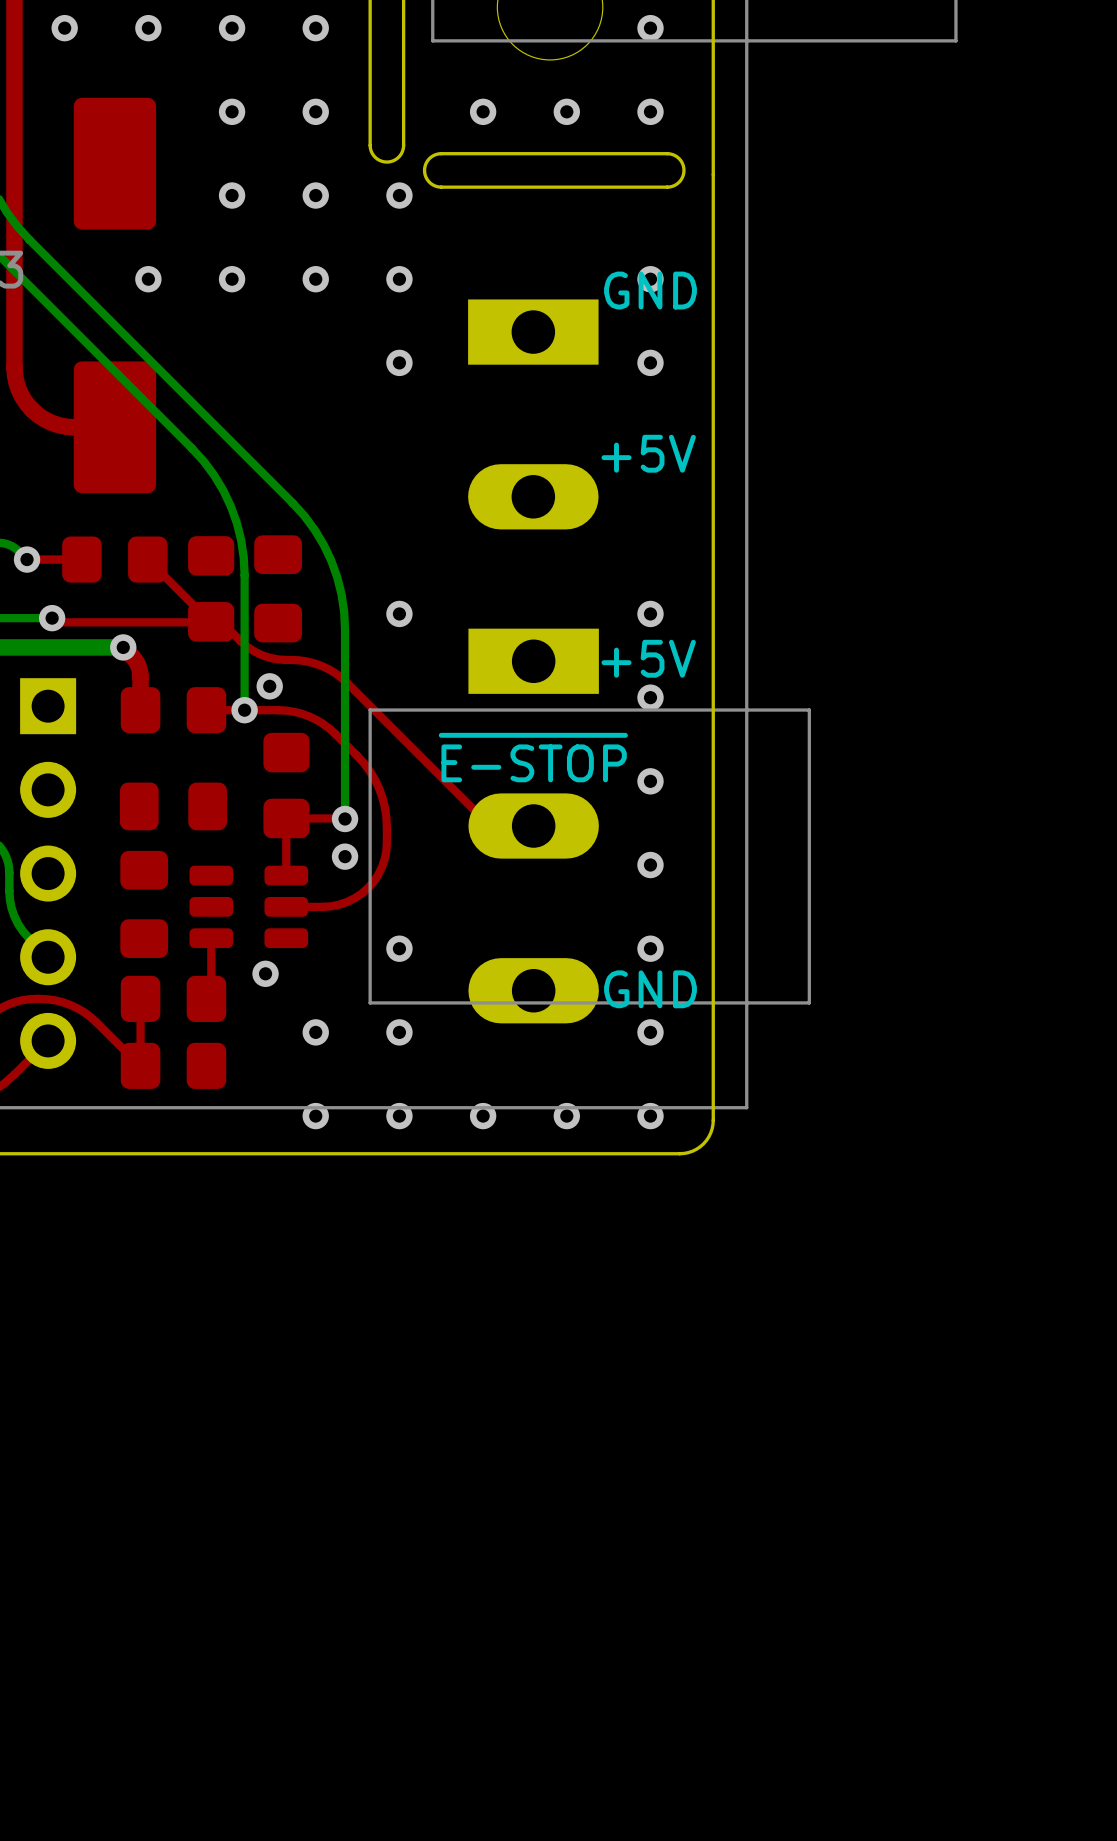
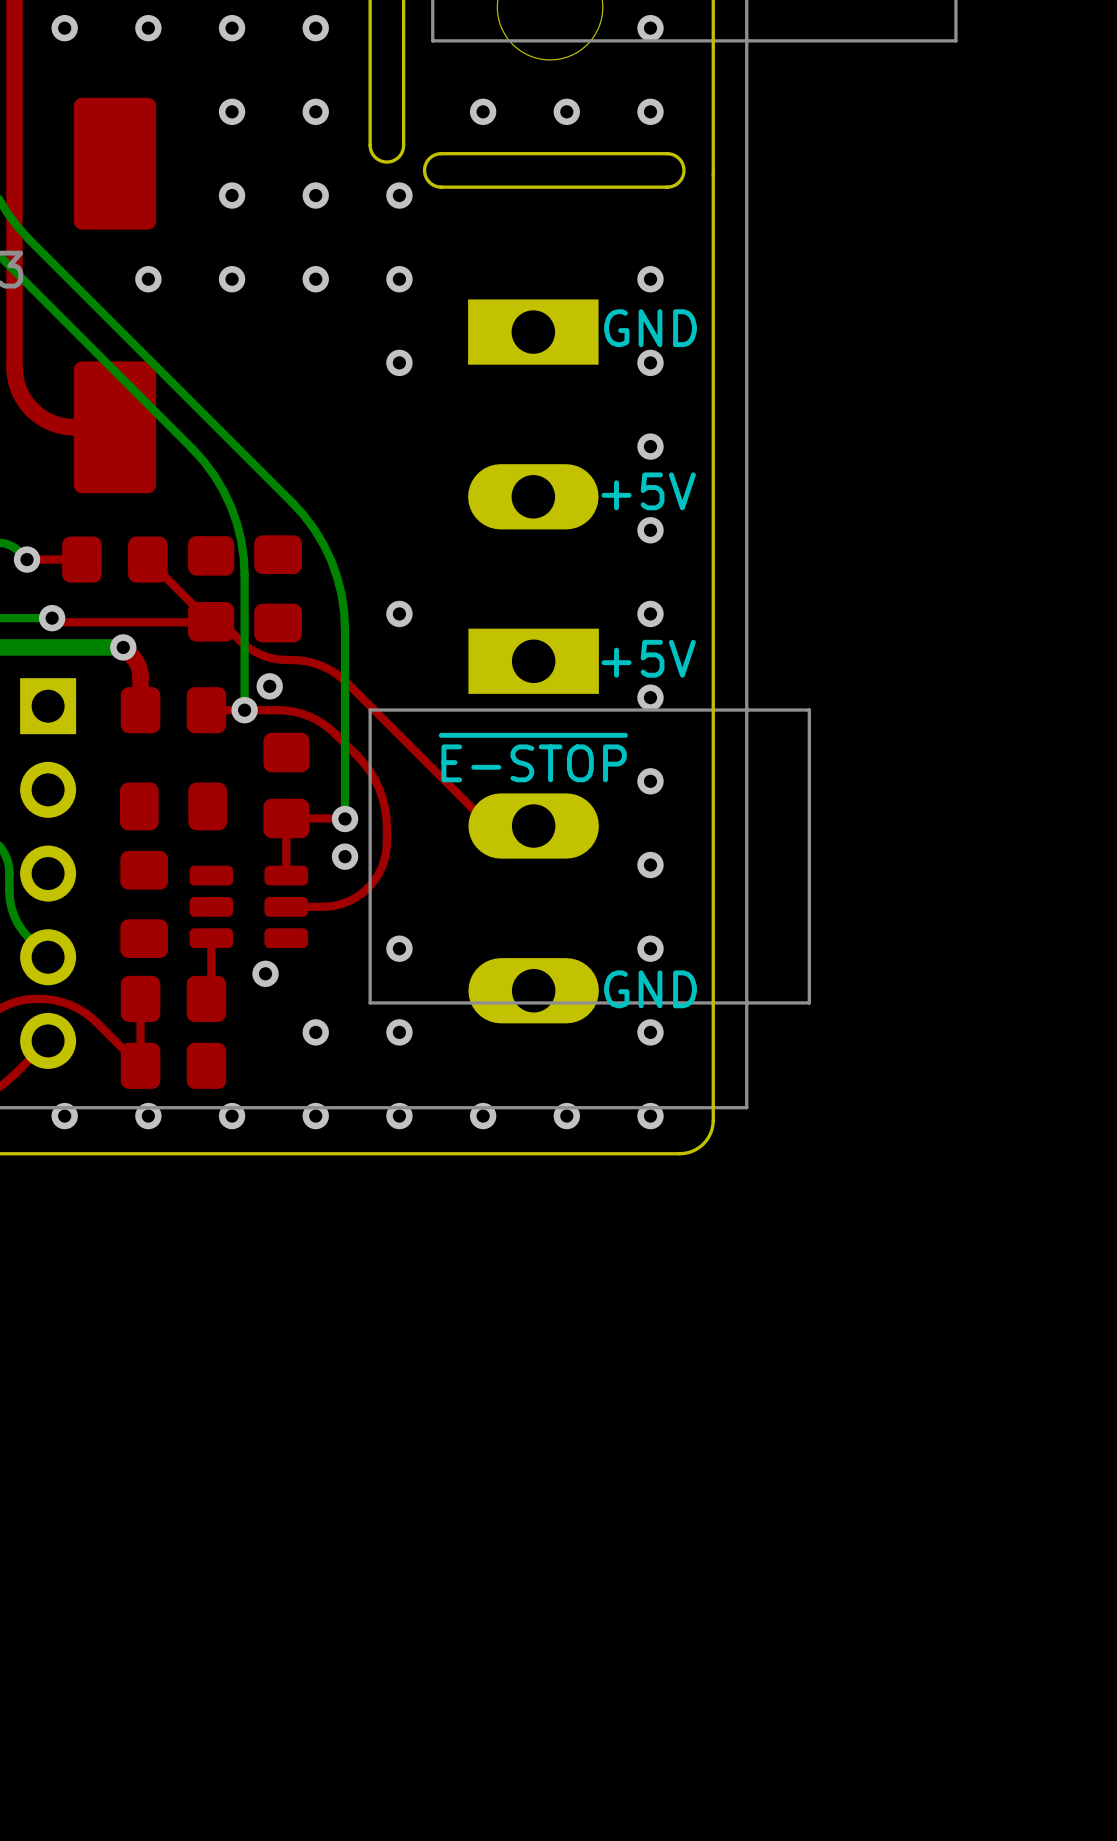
text position: GND (650, 290) -> GND (650, 328)
via: none -> (650, 446)
text position: +5V (648, 453) -> +5V (648, 491)
via: none -> (650, 530)
via: none -> (64, 1116)
via: none -> (148, 1116)
via: none -> (232, 1116)

